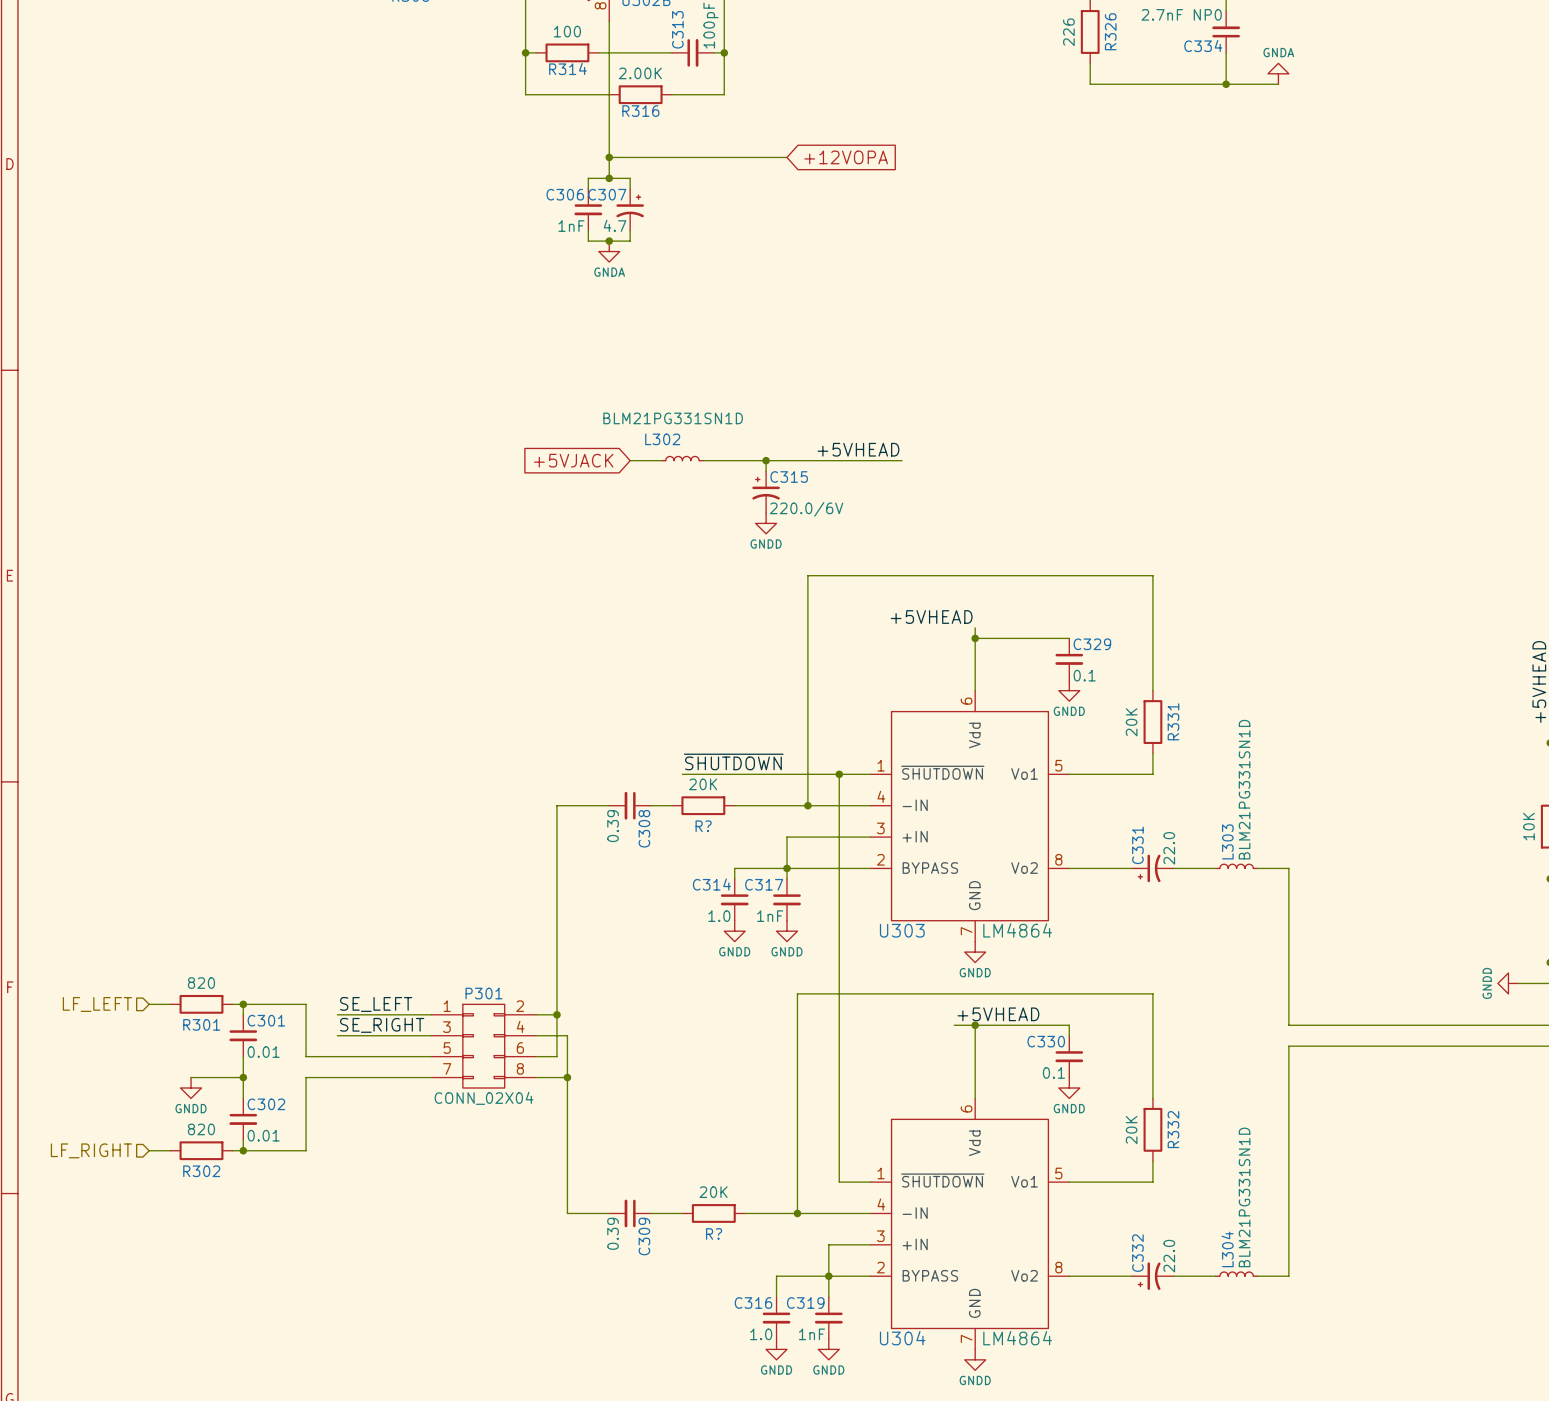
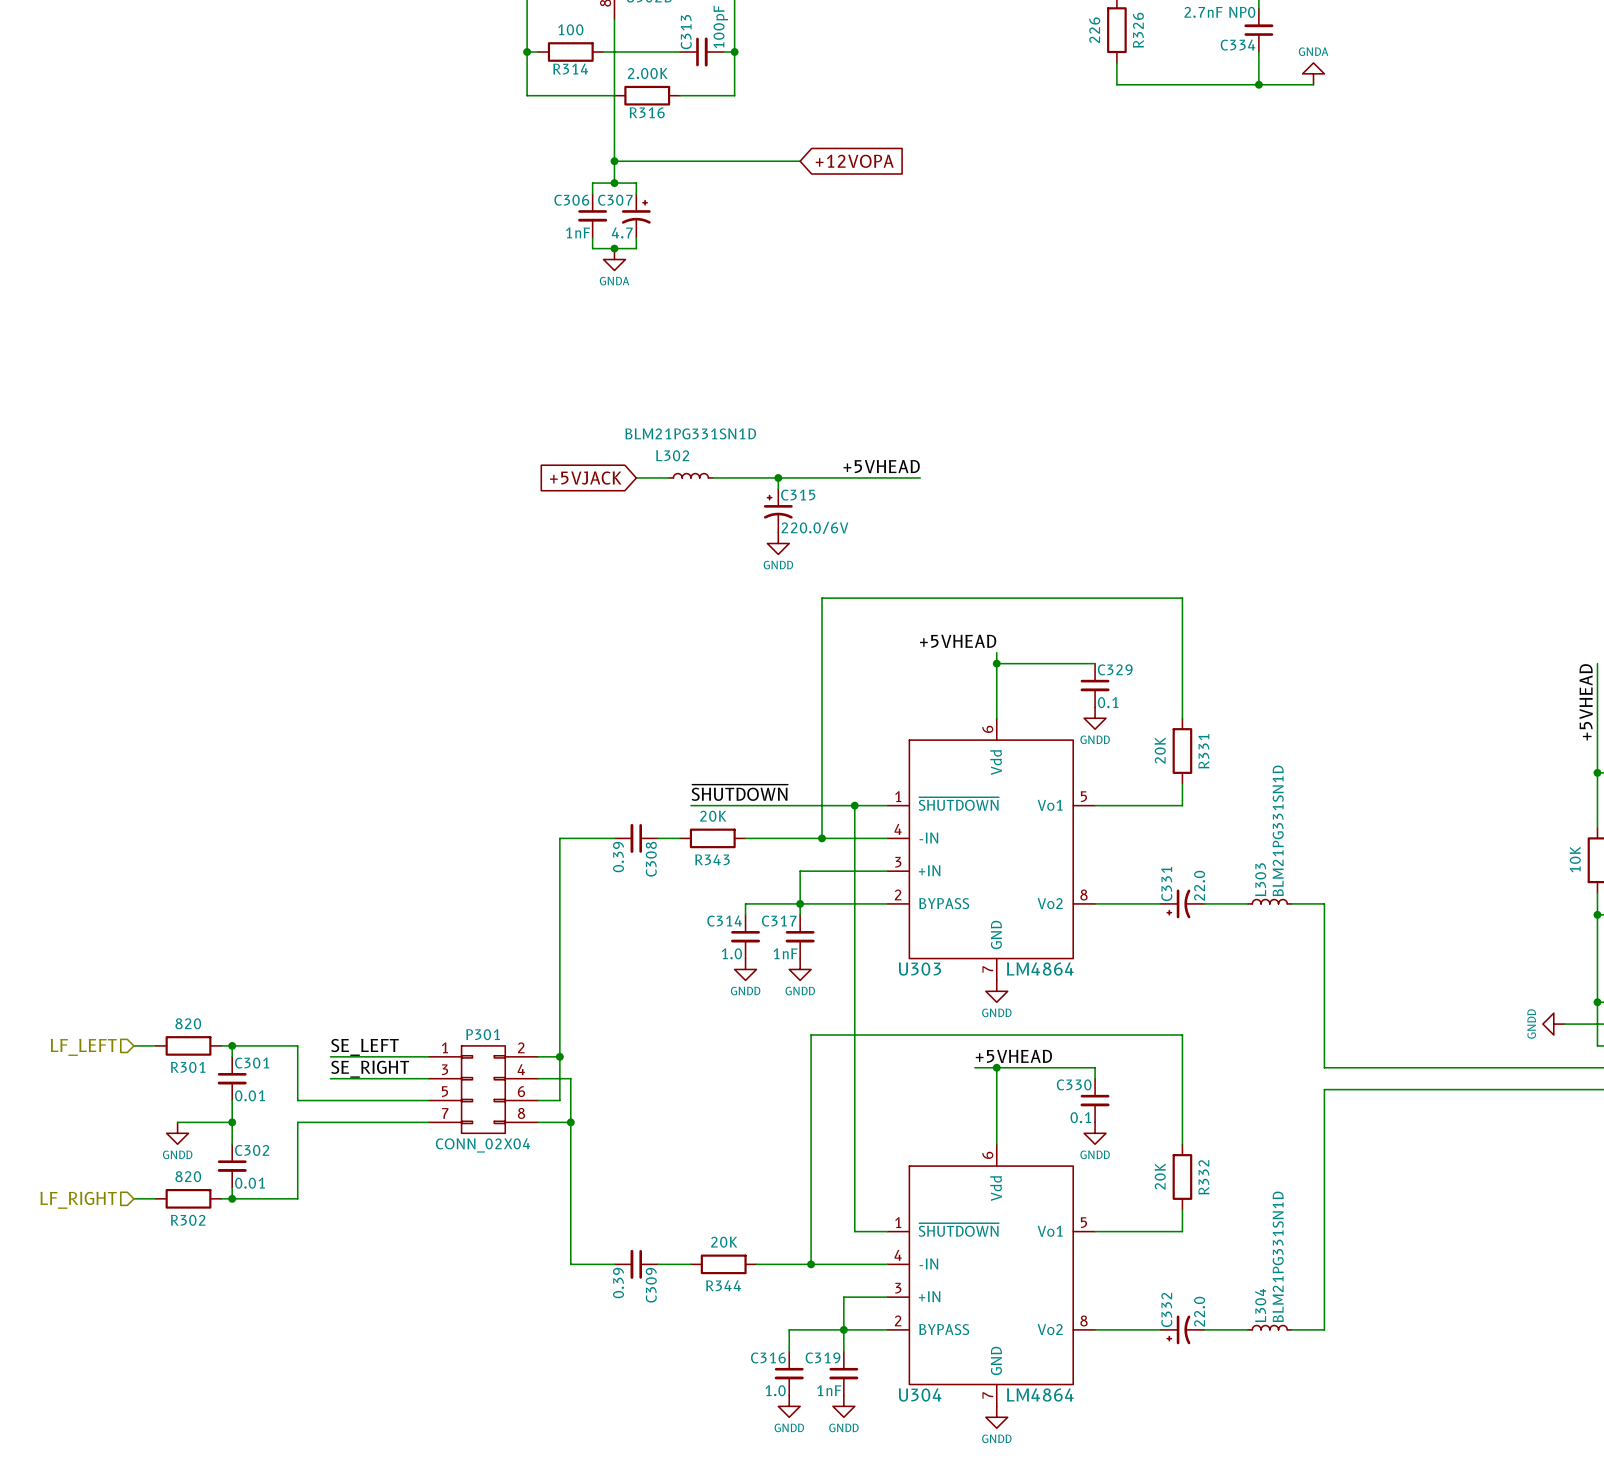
R? name: R? (703, 826) -> R343 (712, 859)
R? name: R? (714, 1233) -> R344 (723, 1285)

